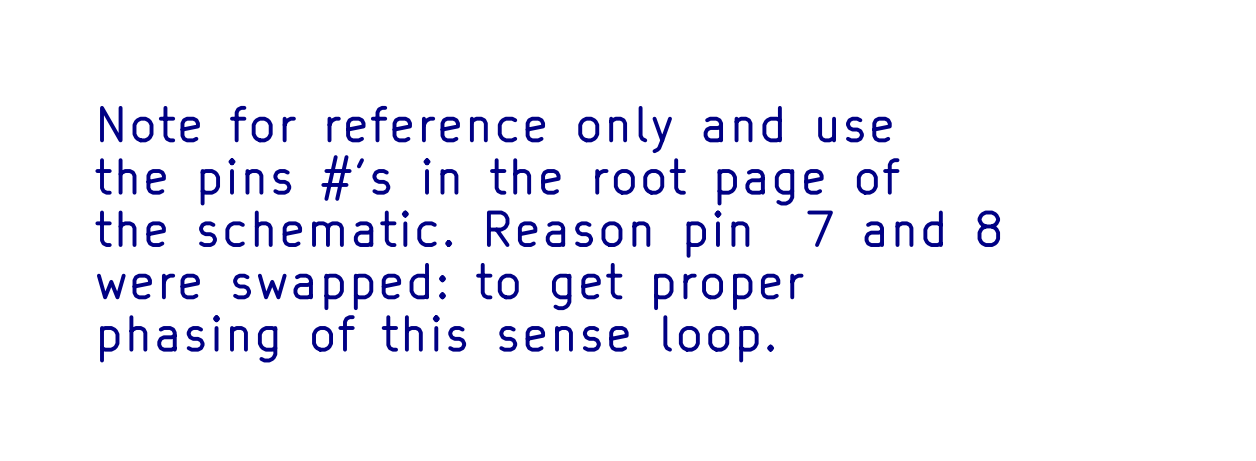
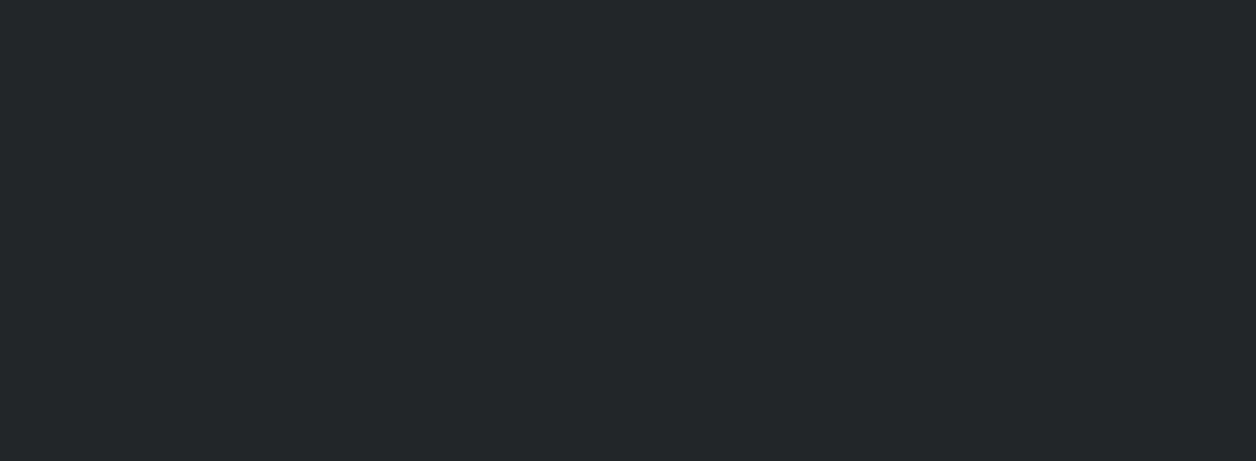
text: Note for reference only and use (495, 129) -> none
text: the pins #'s in the root page of (497, 180) -> none
text: the schematic. Reason pin 7 and 8 (547, 234) -> none
text: were swapped: to get proper (450, 286) -> none
text: phasing of this sense loop. (437, 338) -> none

